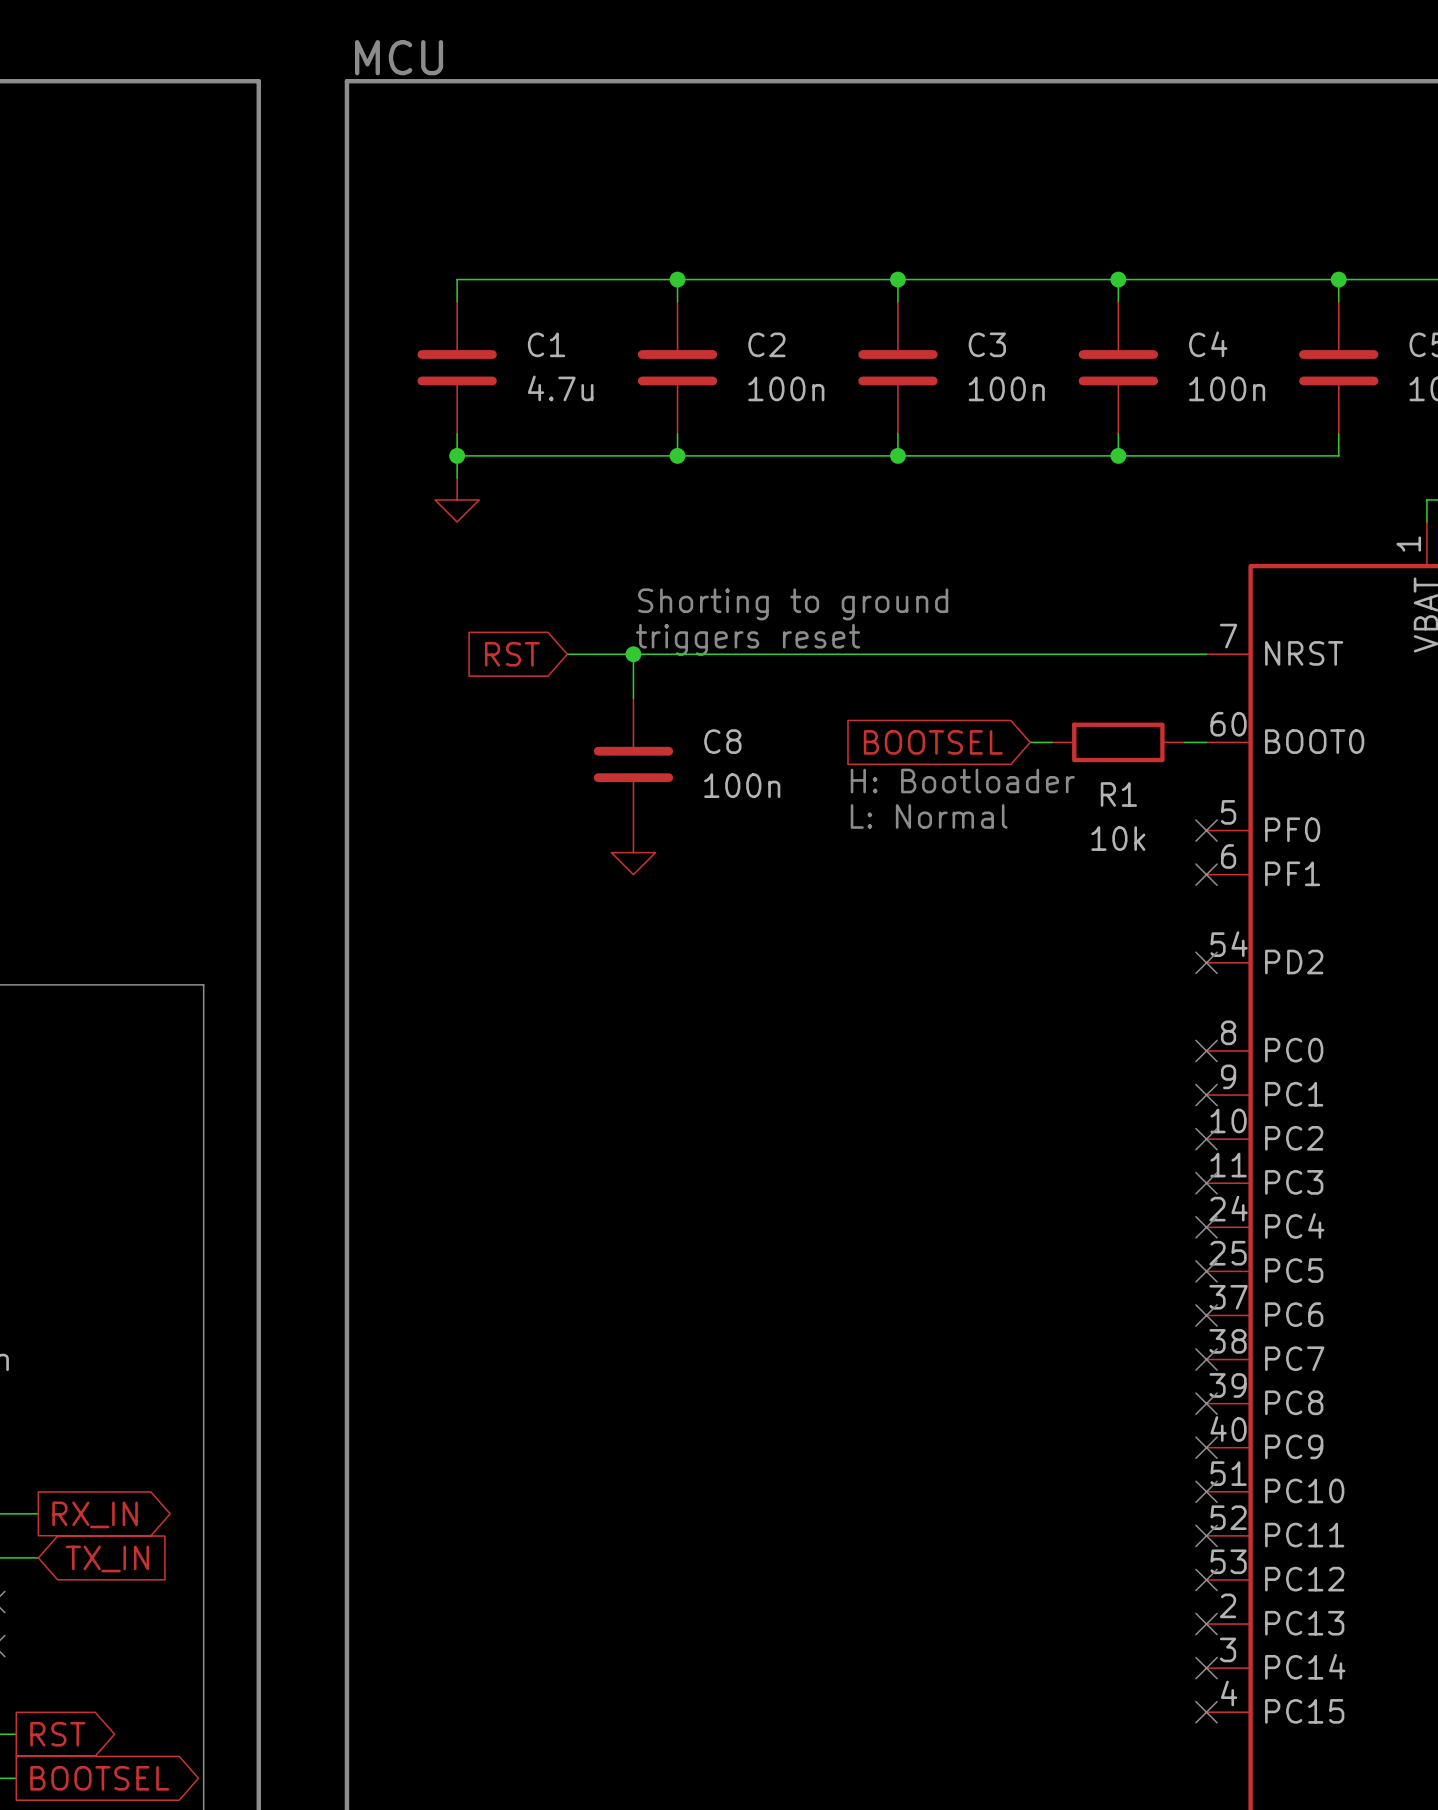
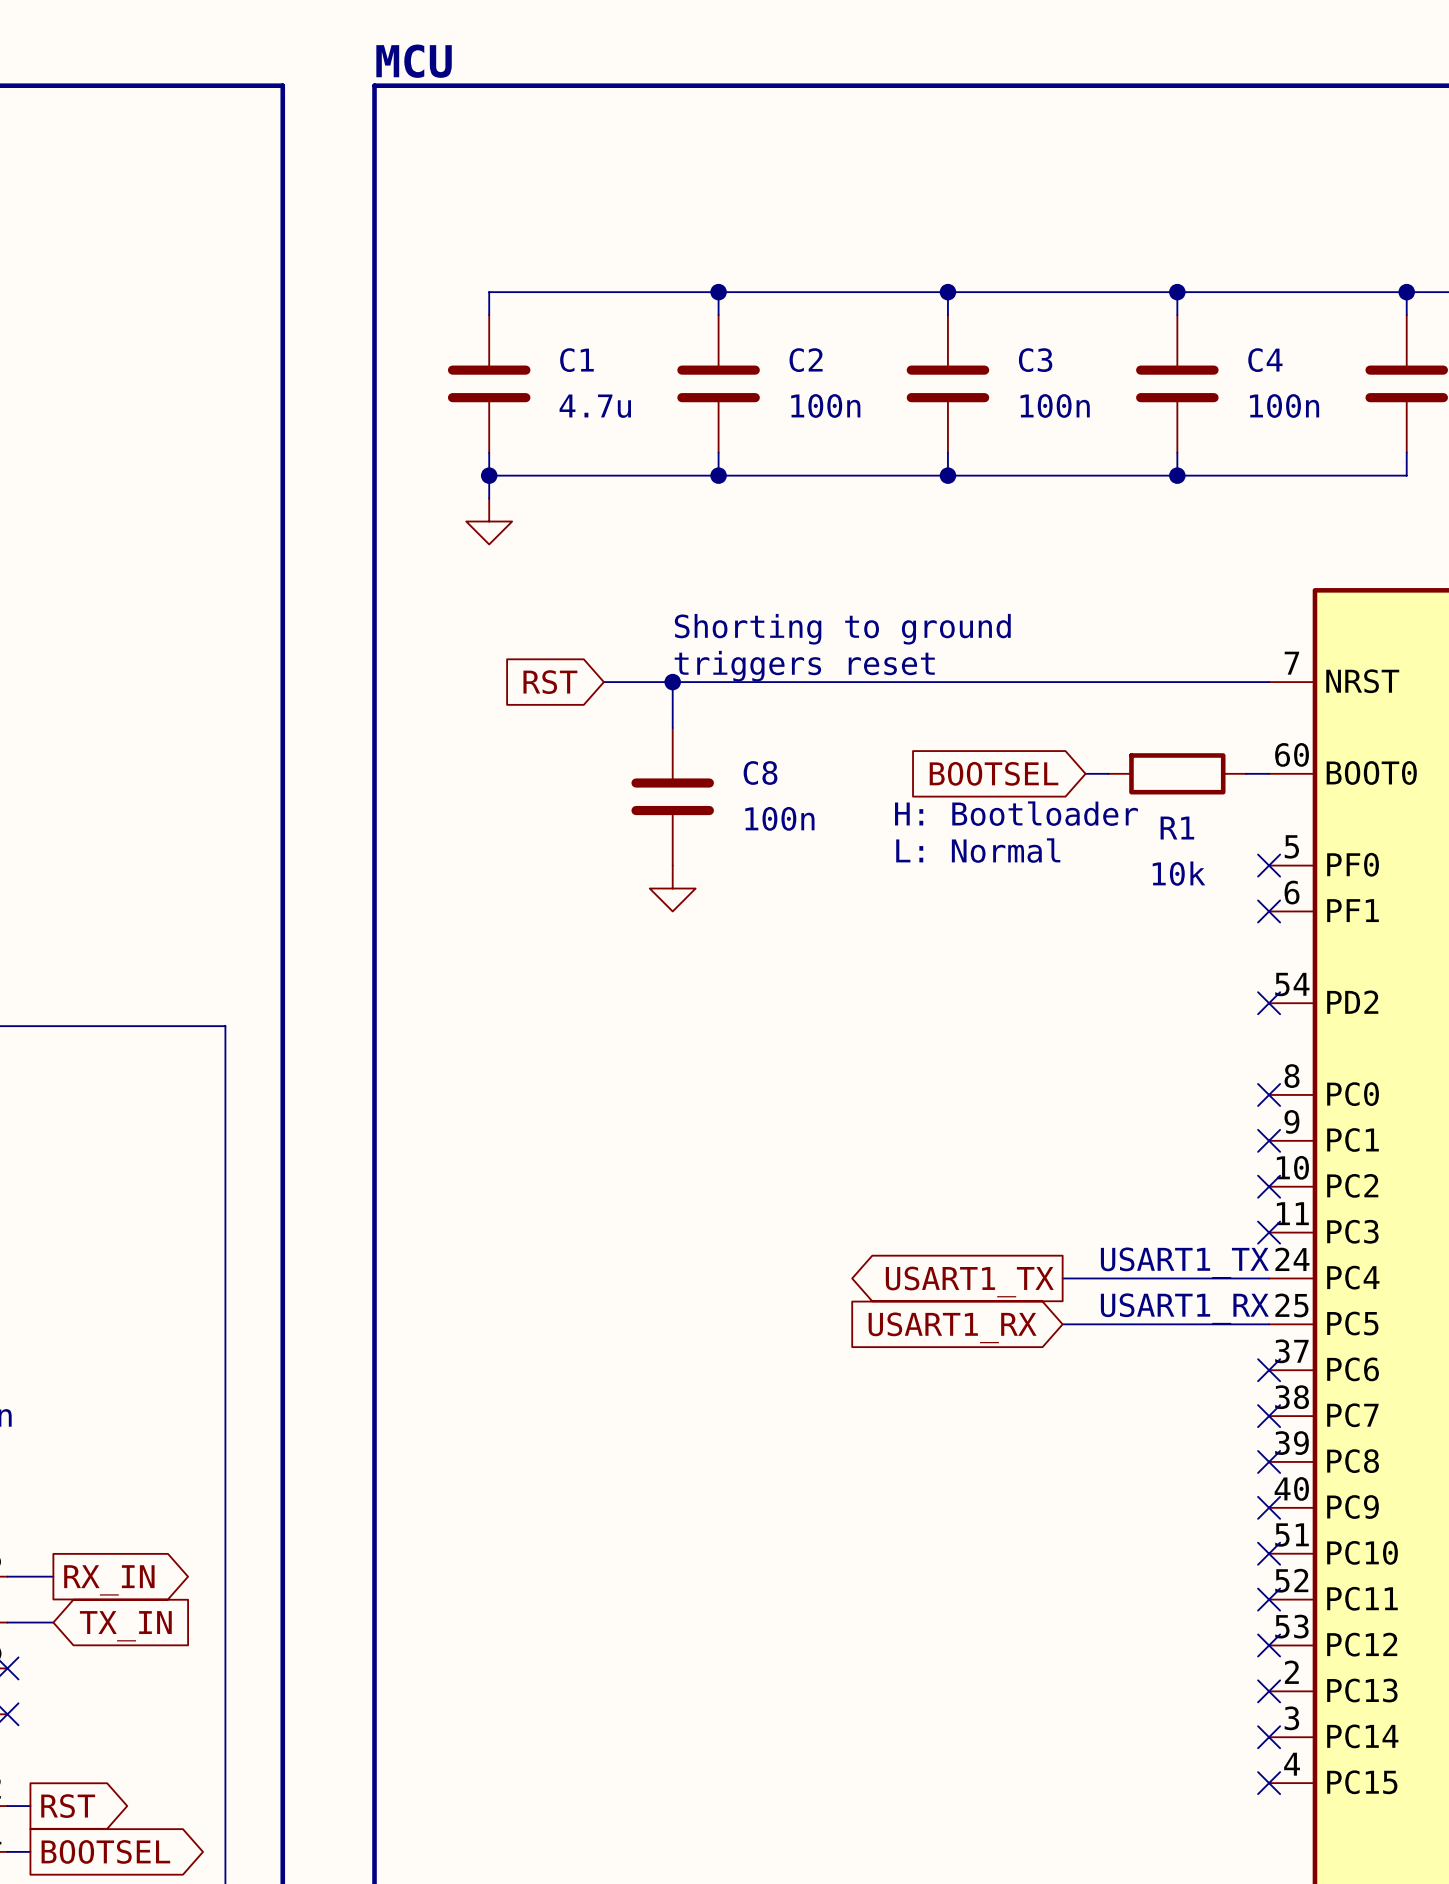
text: none -> USART1_TX (1184, 1262)
wire: none -> (1062, 1278) (1269, 1278)
no-connect mark: (1206, 1227) -> none
global label: none -> USART1_TX (969, 1281)
text: none -> USART1_RX (1184, 1308)
wire: none -> (1062, 1324) (1269, 1324)
no-connect mark: (1206, 1271) -> none
global label: none -> USART1_RX (952, 1327)

